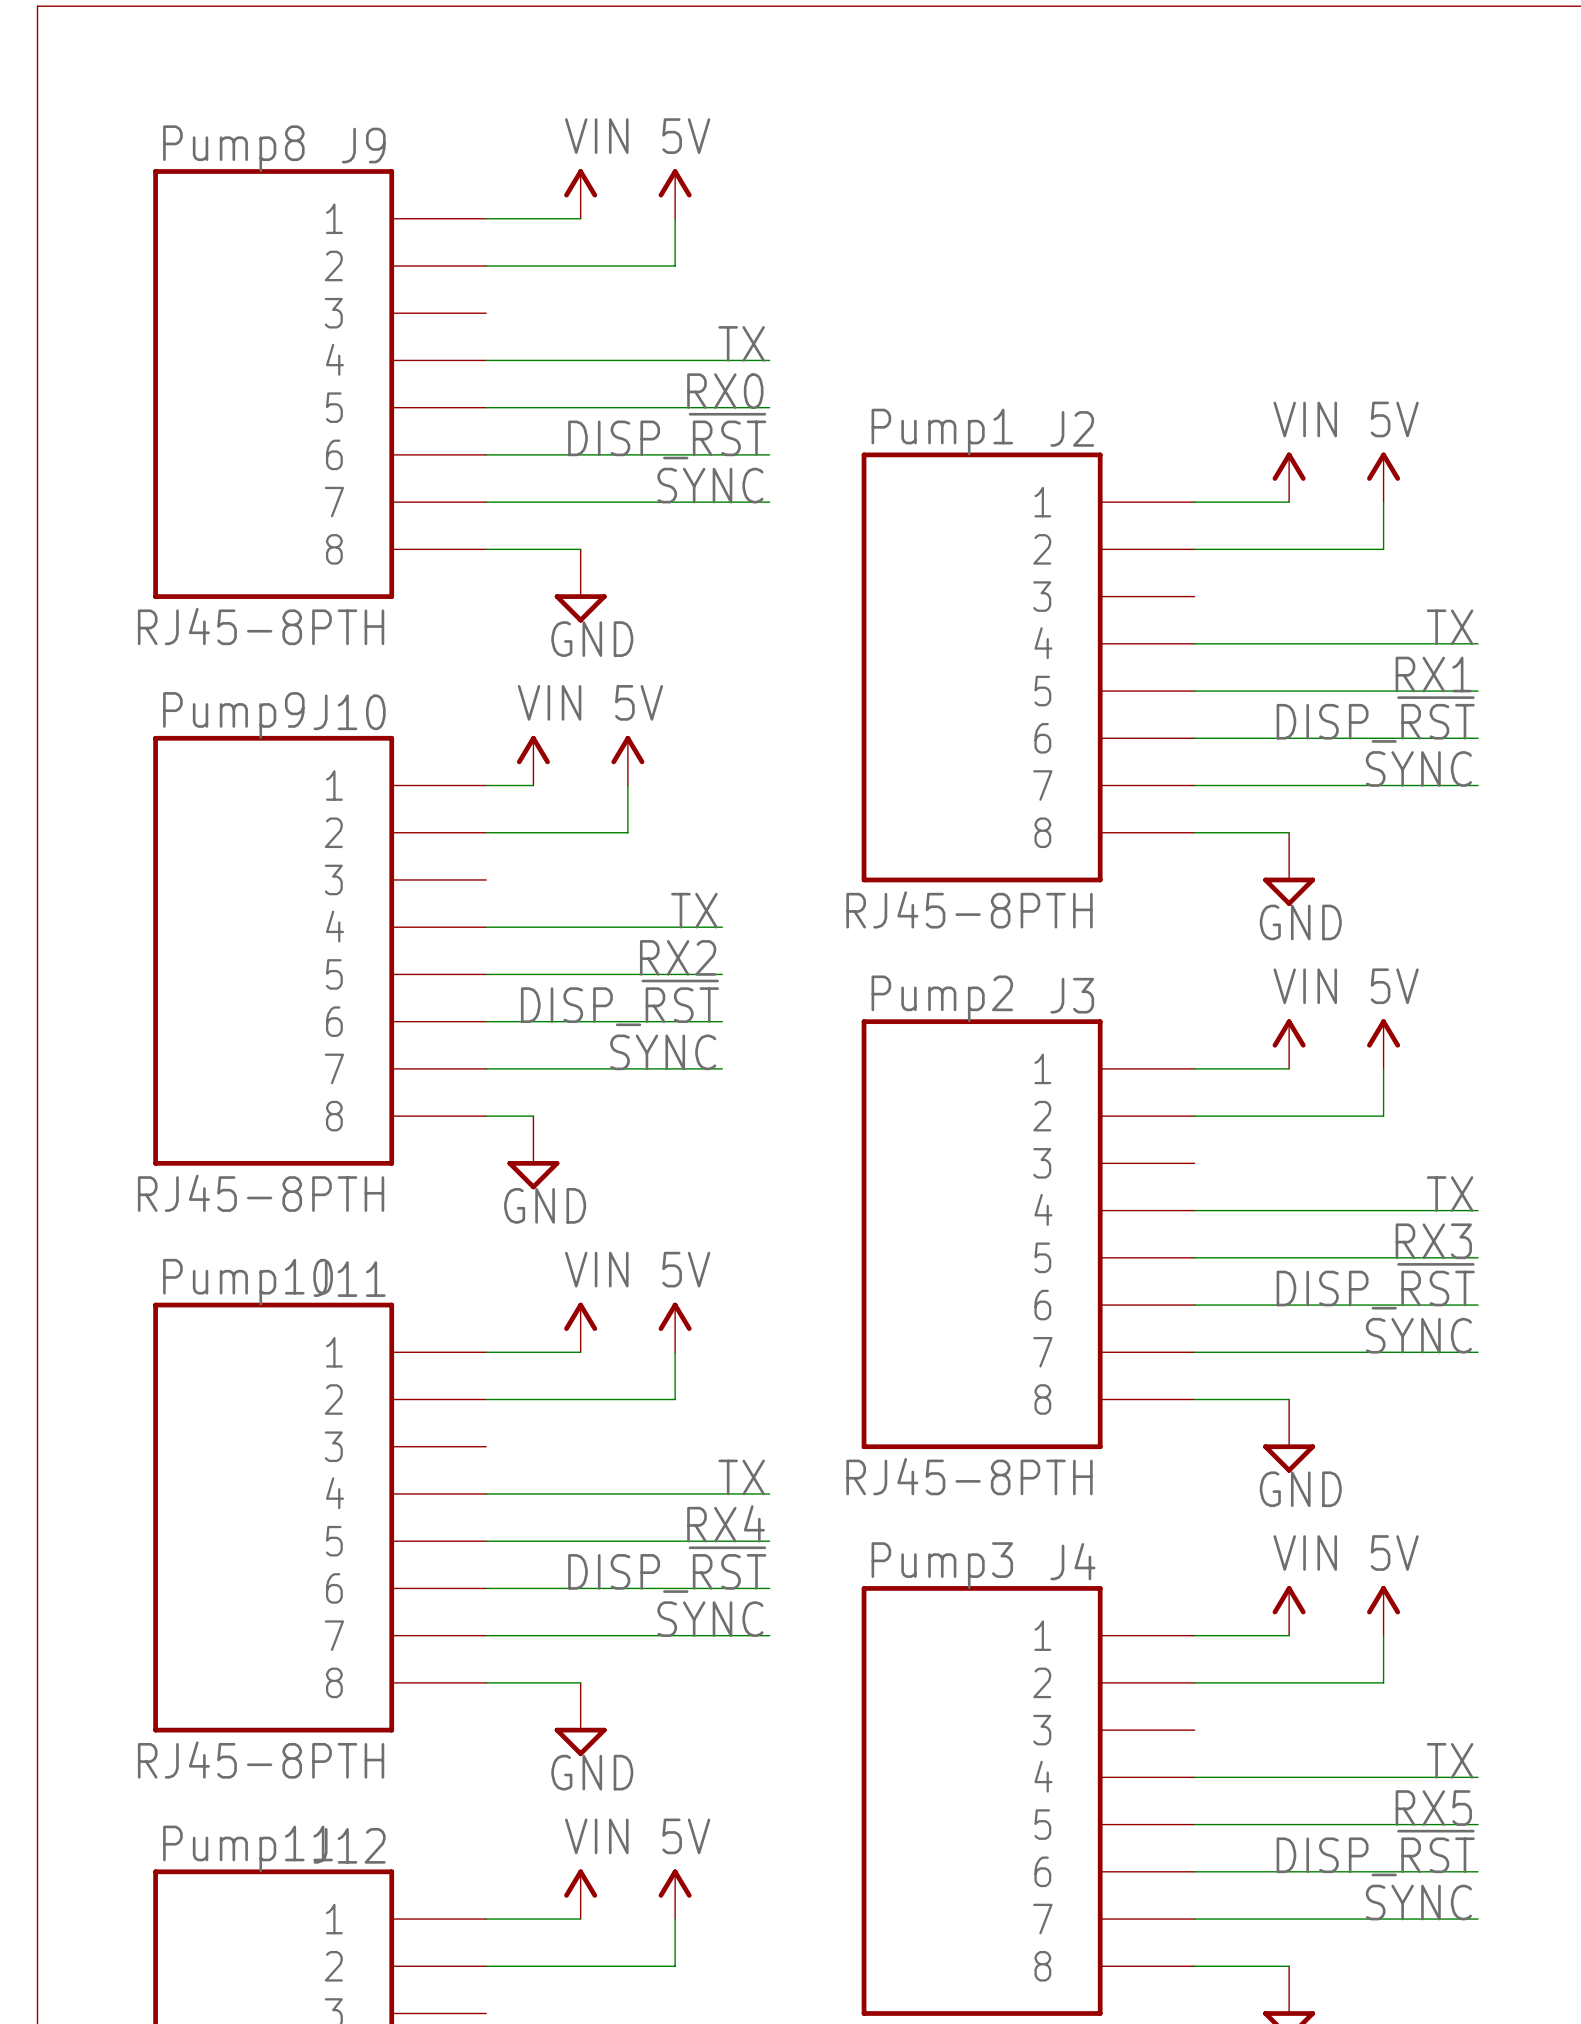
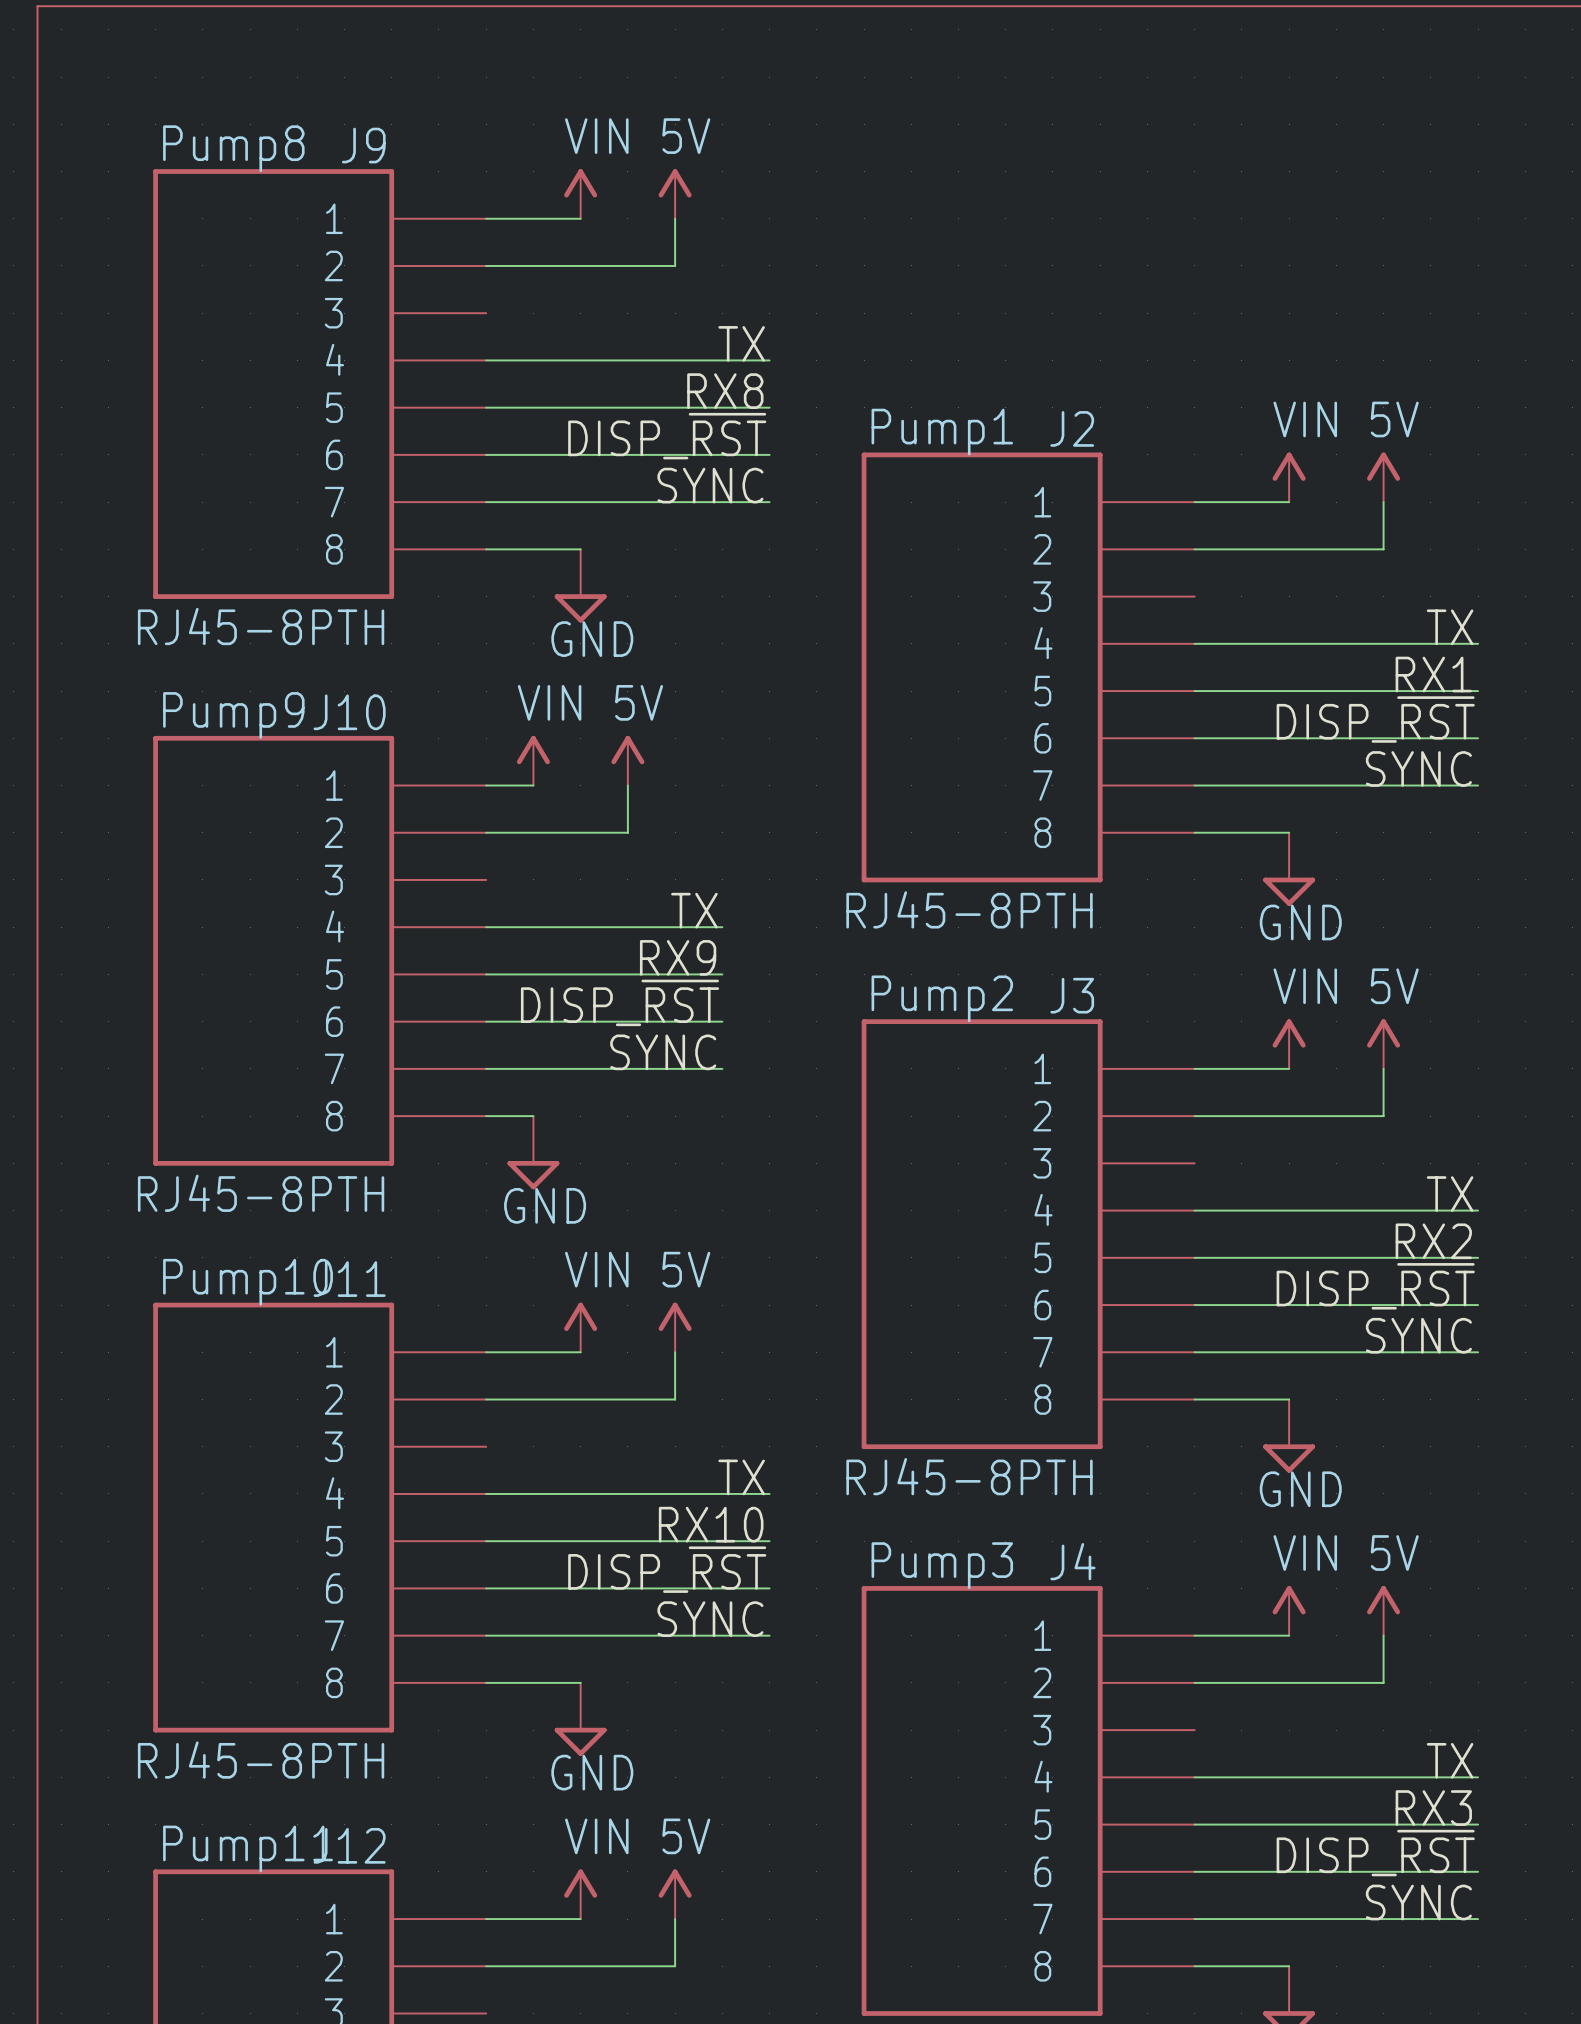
label: RX0 (725, 391) -> RX8 (725, 391)
label: RX2 (678, 957) -> RX9 (678, 957)
label: RX3 (1433, 1241) -> RX2 (1433, 1241)
label: RX4 (726, 1523) -> RX10 (711, 1524)
label: RX5 (1433, 1808) -> RX3 (1433, 1808)

